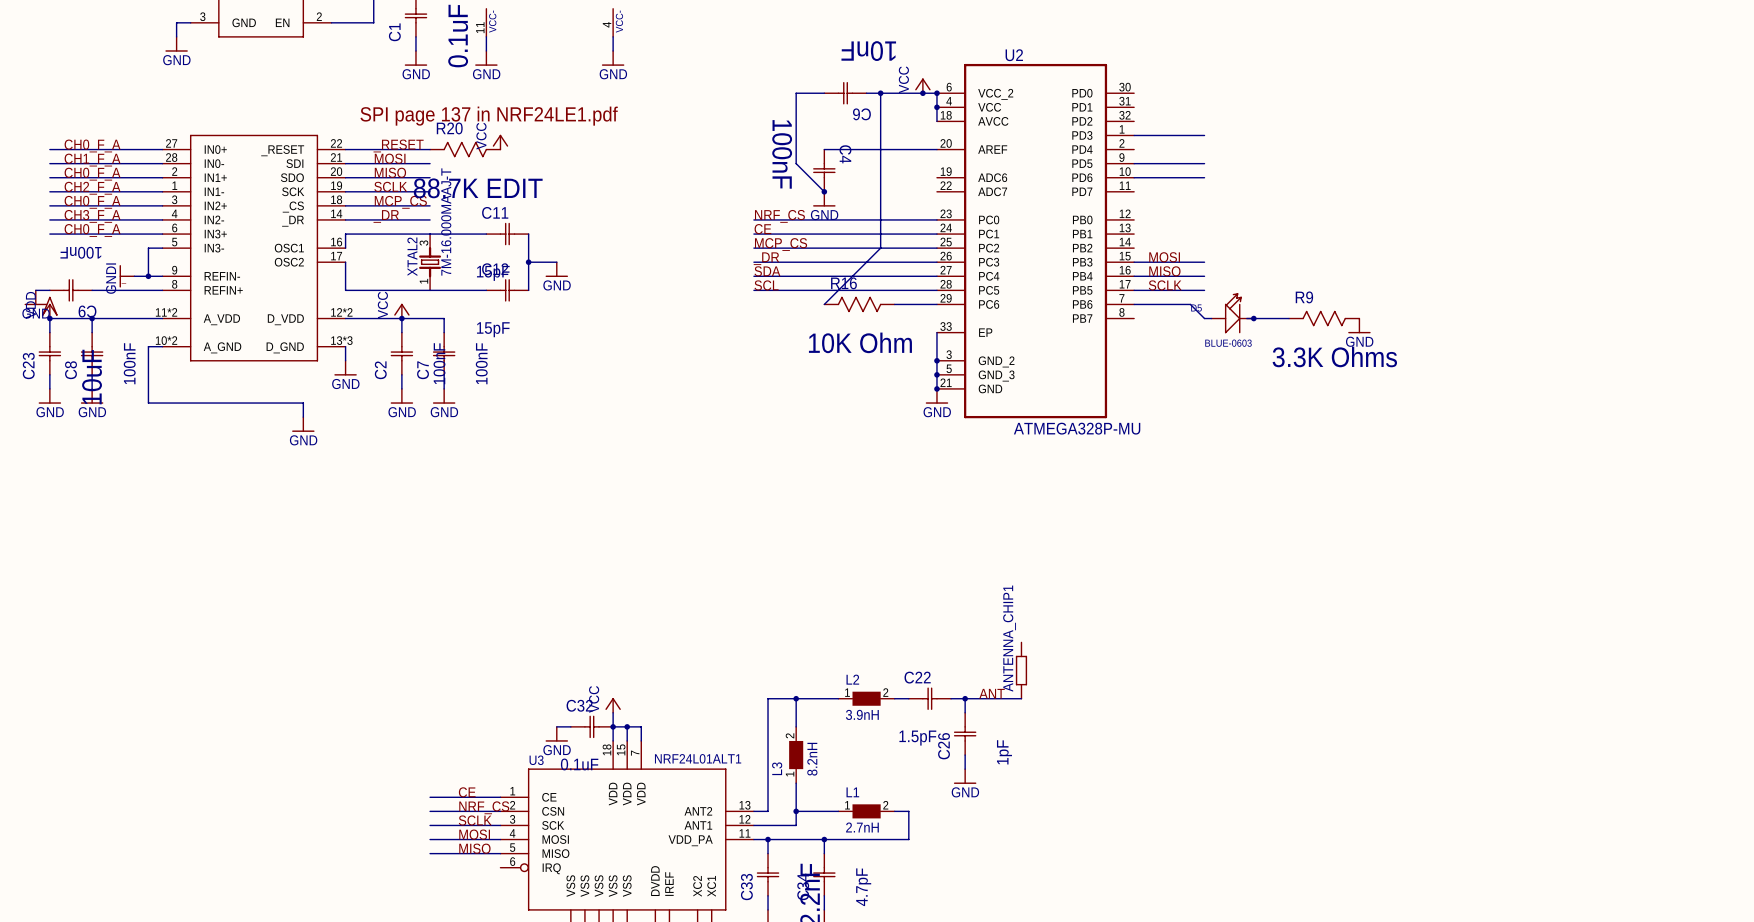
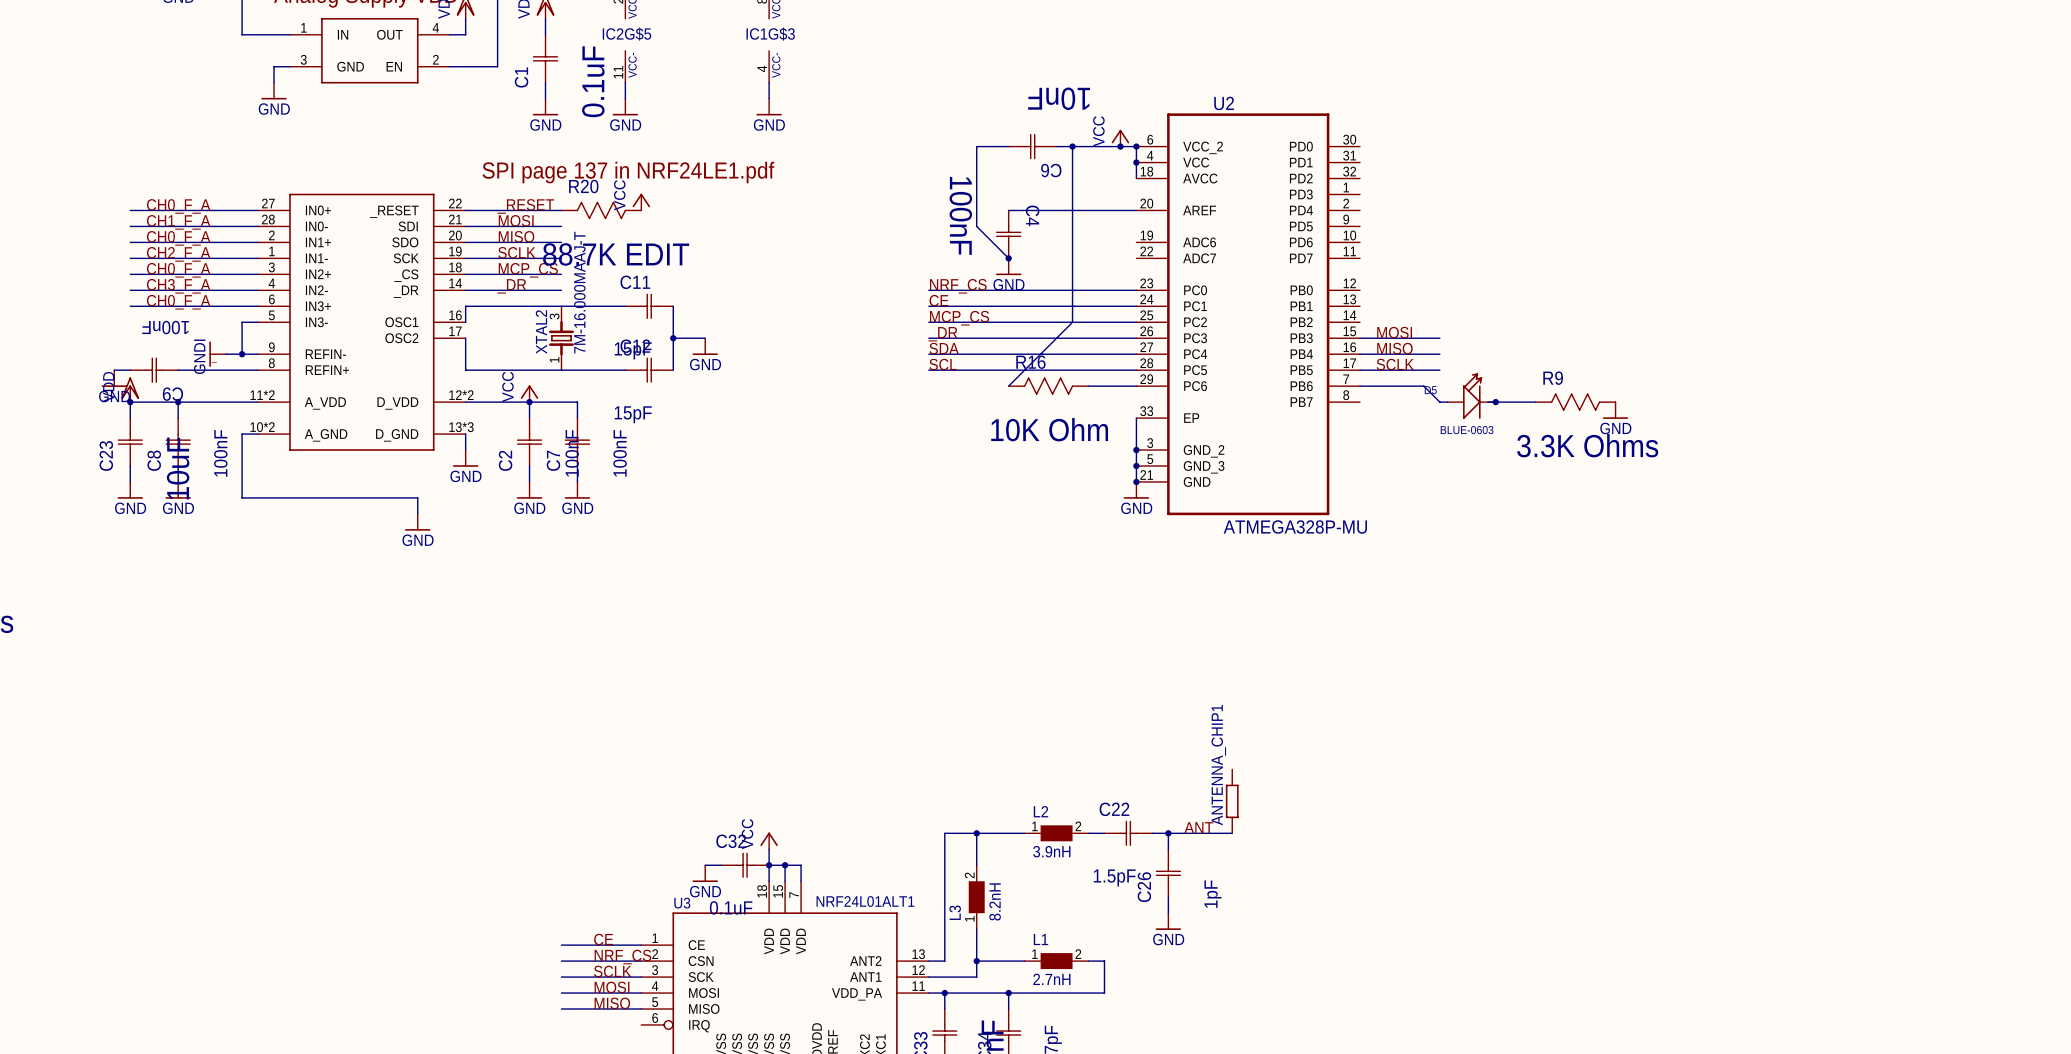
wire: (1134, 135) (1204, 135) -> none
wire: (1134, 163) (1204, 163) -> none
wire: (1134, 177) (1204, 177) -> none

